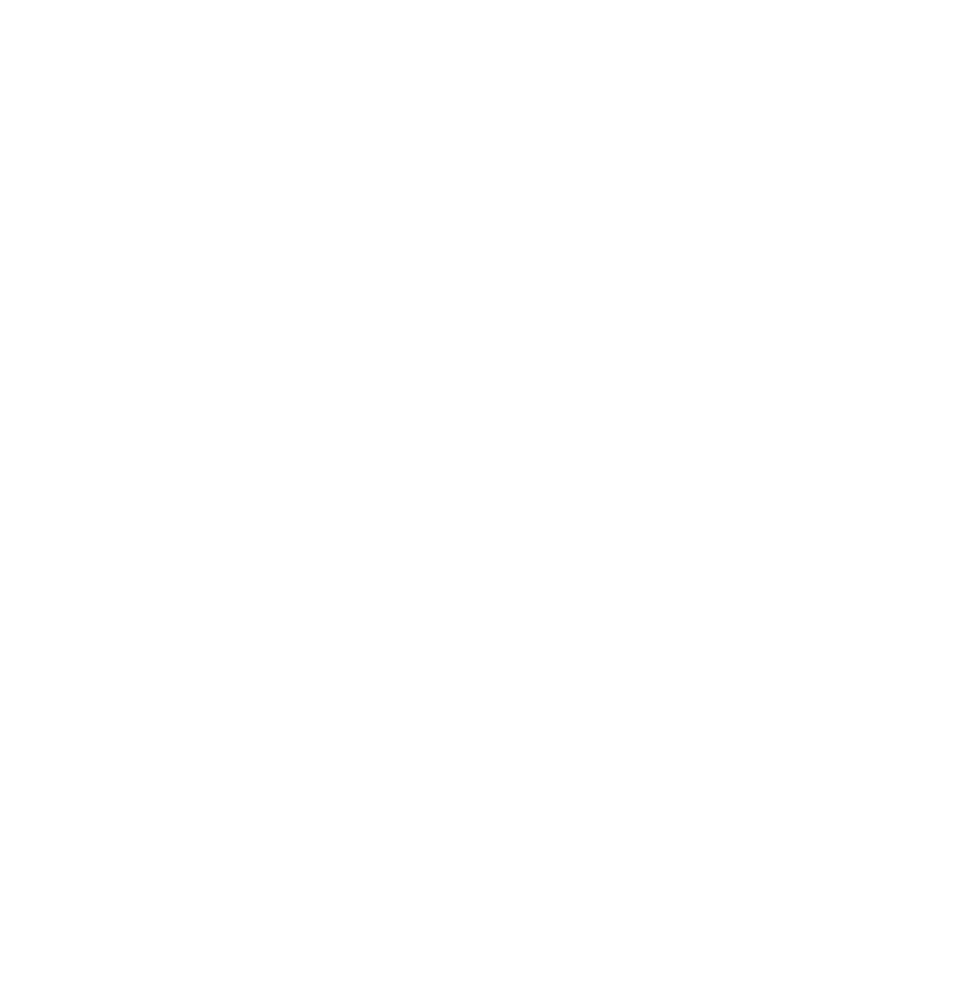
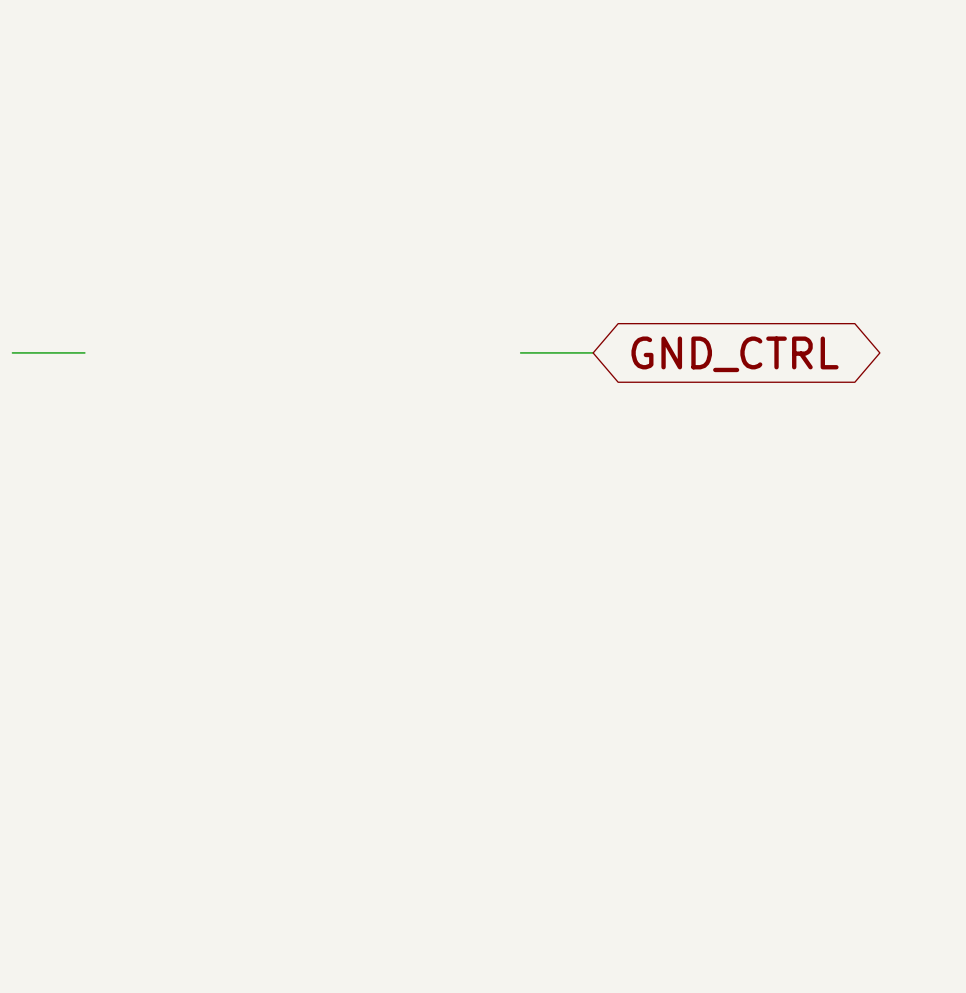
wire: none -> (12, 352) (84, 352)
wire: none -> (520, 352) (593, 352)
global label: none -> GND_CTRL (735, 354)

